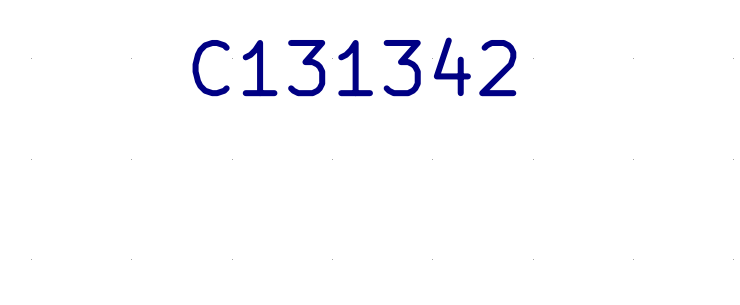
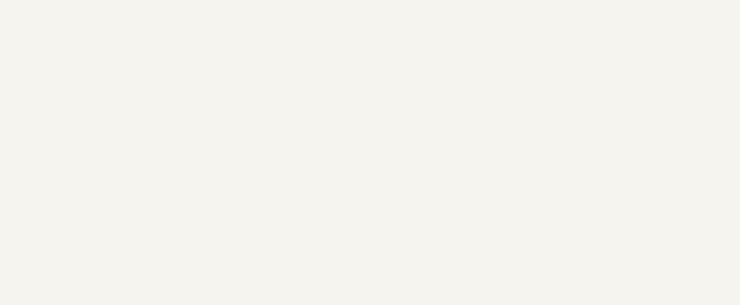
text: C131342 (354, 66) -> none

